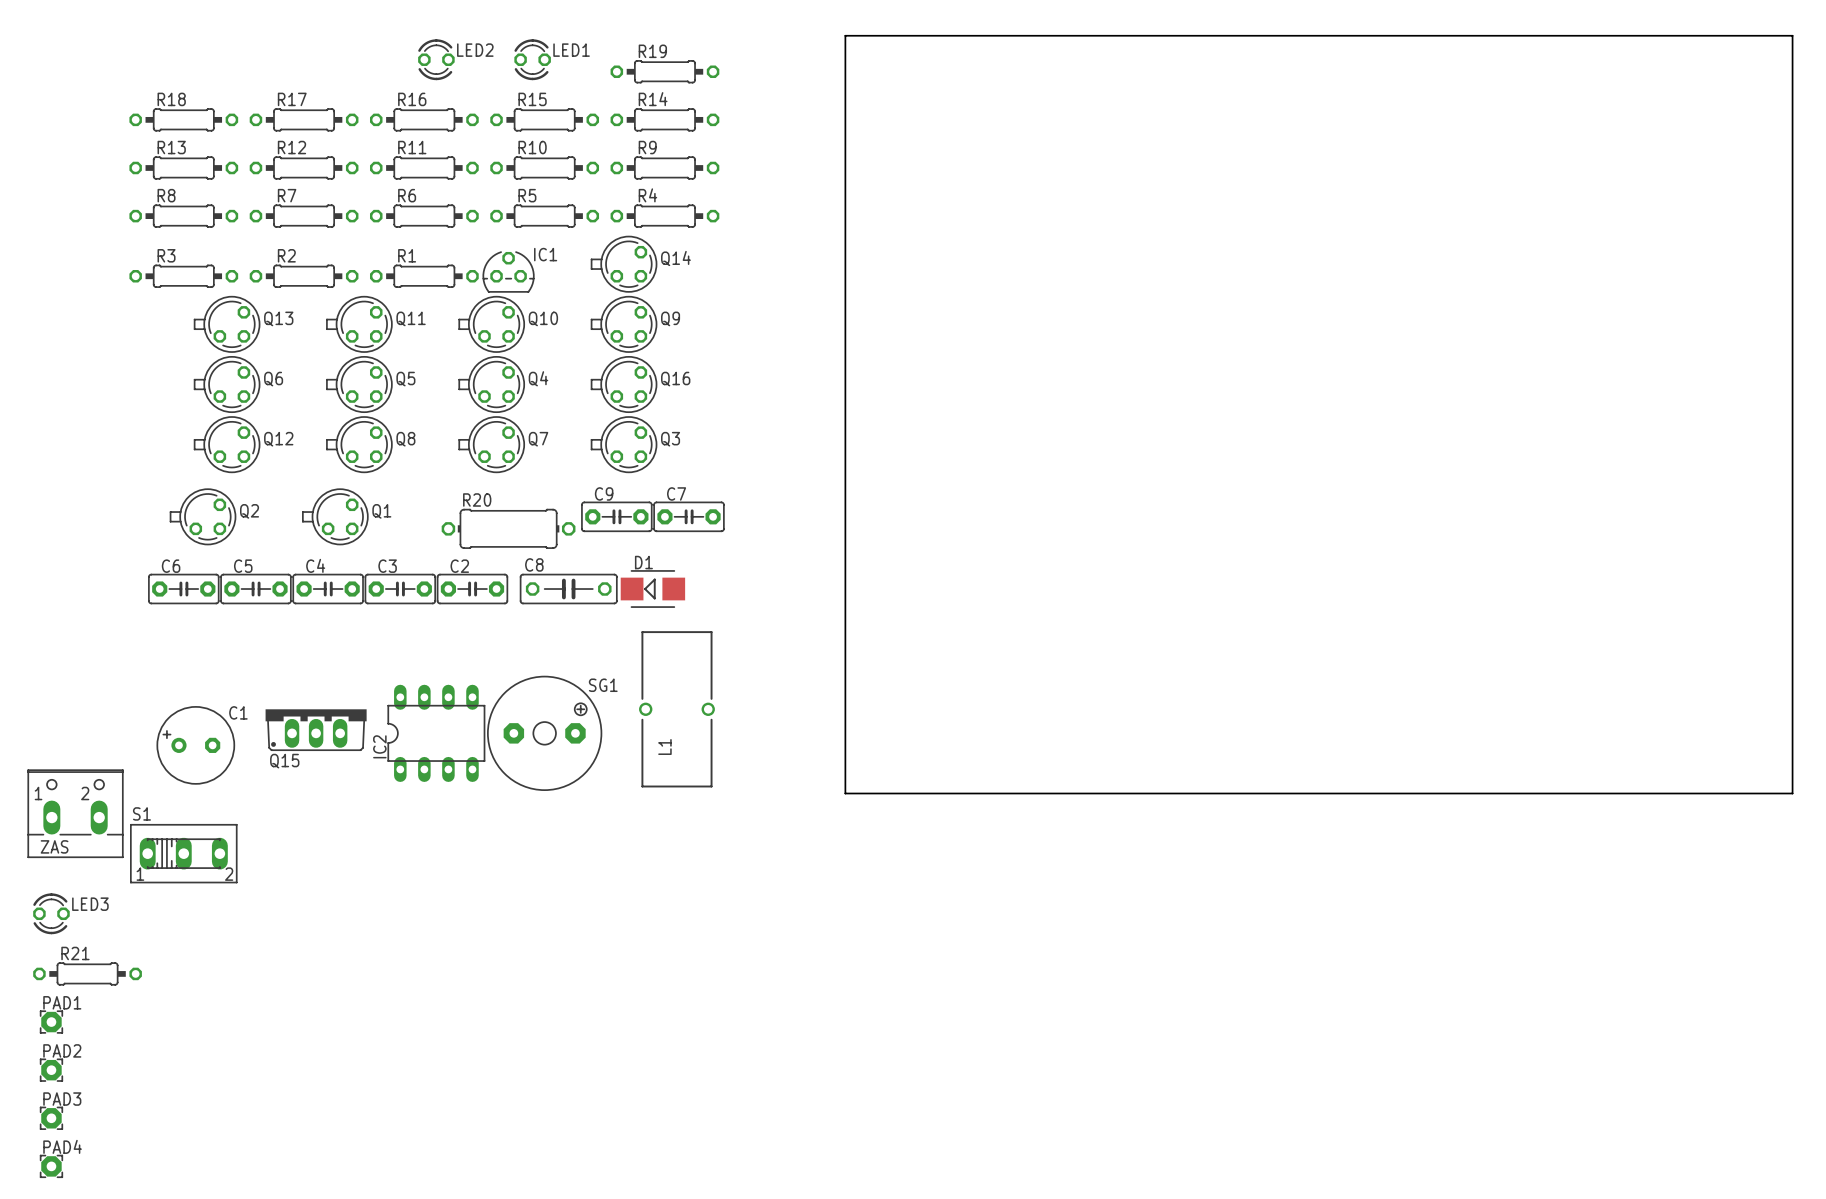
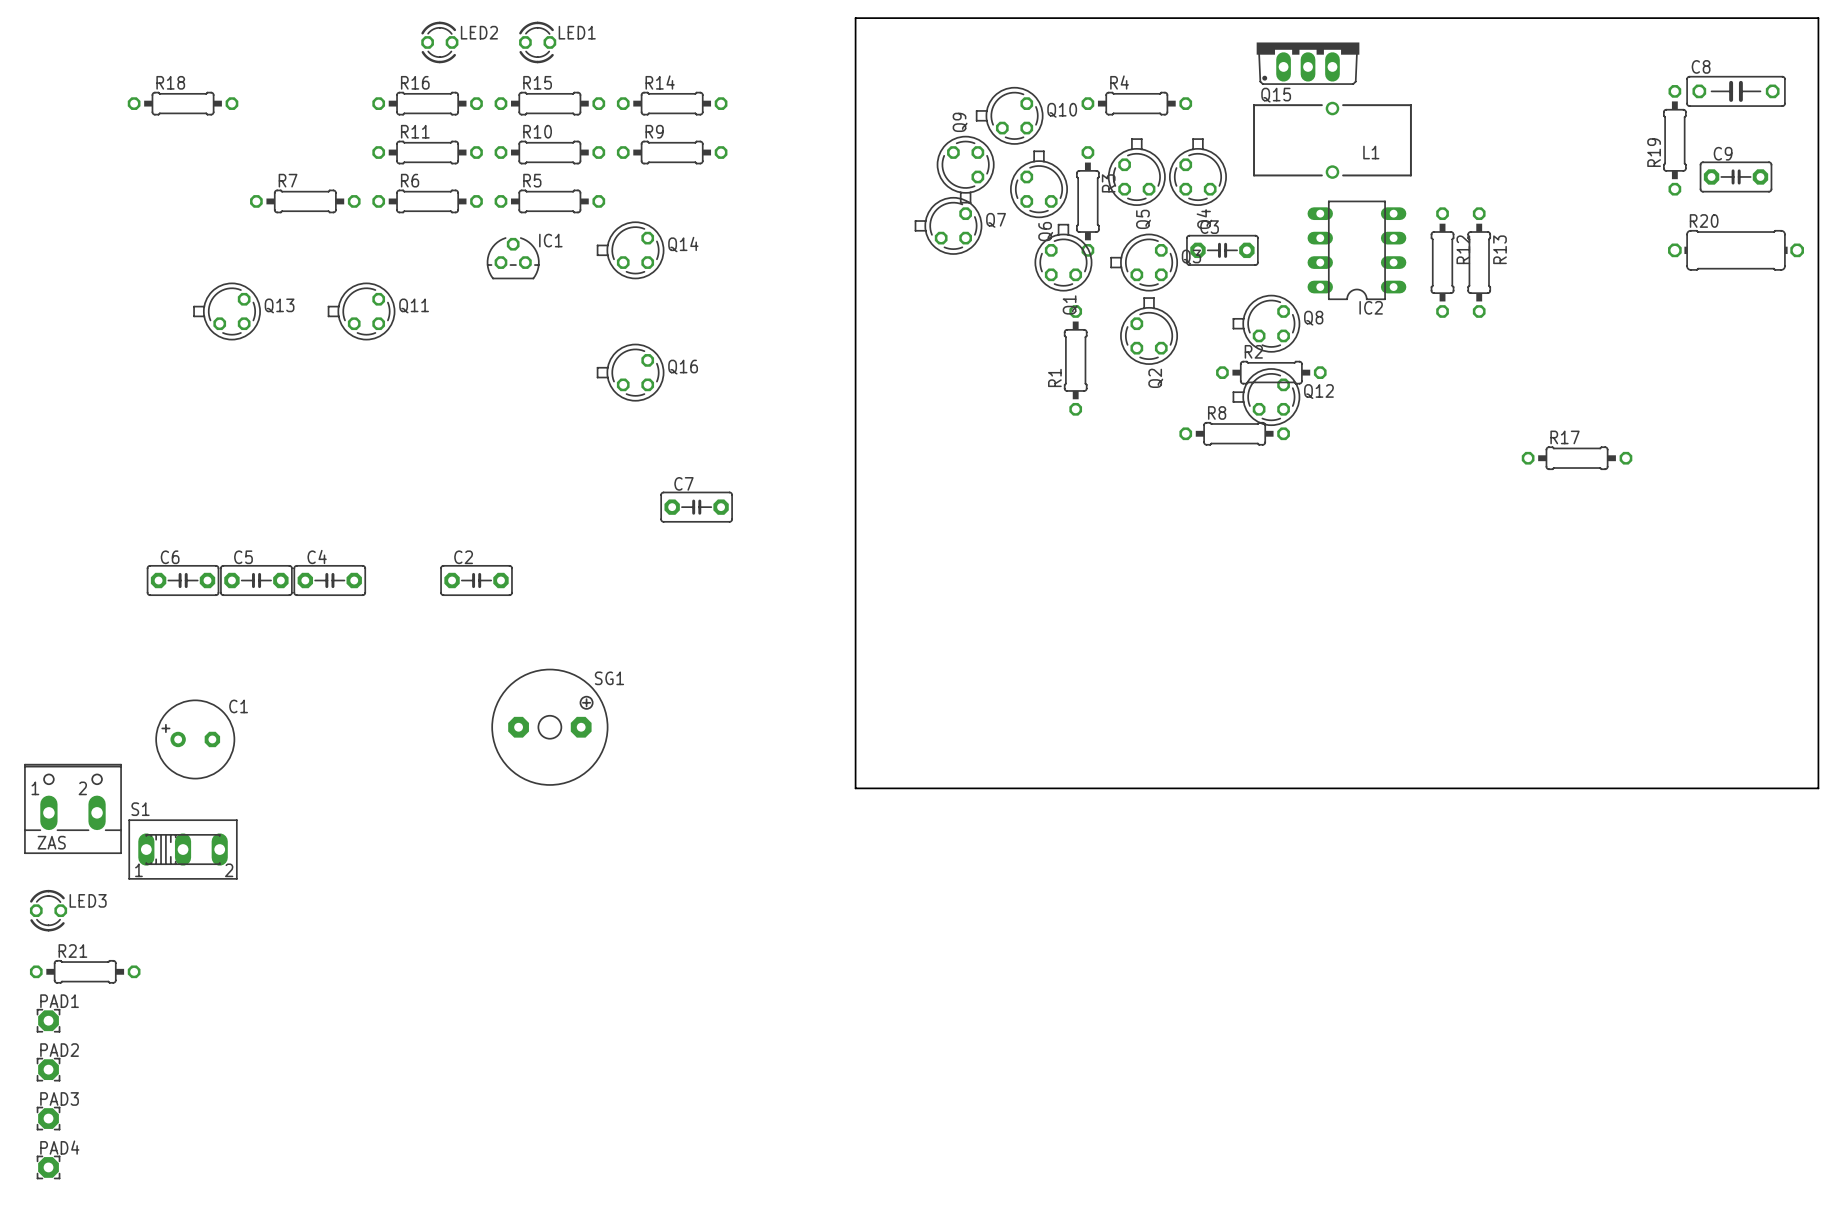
R19 name position: R19 (652, 51) -> R19 (1654, 152)
R19 rotation: 0° (664, 71) -> 90° clockwise (1674, 140)
R19 position: (664, 71) -> (1674, 140)
R17 position: (304, 119) -> (1577, 458)
R13 rotation: 0° (183, 167) -> 90° clockwise (1479, 262)
R13 position: (183, 167) -> (1479, 262)
R12 rotation: 0° (304, 167) -> 90° clockwise (1442, 262)
R12 position: (304, 167) -> (1442, 262)
R8 position: (183, 216) -> (1234, 433)
R4 position: (664, 216) -> (1136, 103)
R1 name position: R1 (407, 255) -> R1 (1054, 377)
R3 rotation: 0° (183, 276) -> 90° clockwise (1087, 201)
R3 position: (183, 276) -> (1087, 201)
R2 position: (304, 276) -> (1271, 372)
R1 rotation: 0° (424, 276) -> 90° clockwise (1075, 360)
R1 position: (424, 276) -> (1075, 360)
Q10 position: (491, 324) -> (1009, 115)
Q9 rotation: 0° (624, 324) -> 90° counterclockwise (965, 169)
Q9 position: (624, 324) -> (965, 169)
Q6 rotation: 0° (227, 384) -> 90° clockwise (1039, 184)
Q6 position: (227, 384) -> (1039, 184)
Q5 rotation: 0° (359, 384) -> 90° clockwise (1136, 172)
Q5 position: (359, 384) -> (1136, 172)
Q4 rotation: 0° (491, 384) -> 90° clockwise (1197, 172)
Q4 position: (491, 384) -> (1197, 172)
Q12 position: (227, 444) -> (1266, 397)
Q8 position: (359, 444) -> (1266, 323)
Q7 position: (491, 444) -> (948, 225)
Q3 position: (624, 444) -> (1144, 262)
Q2 rotation: 0° (203, 516) -> 90° clockwise (1149, 331)
Q2 position: (203, 516) -> (1149, 331)
Q1 rotation: 0° (335, 516) -> 90° clockwise (1063, 257)
Q1 position: (335, 516) -> (1063, 257)
C9 position: (616, 516) -> (1736, 176)
R20 position: (508, 528) -> (1736, 250)
C3 position: (400, 589) -> (1222, 250)
C8 position: (568, 589) -> (1736, 91)
D1: (652, 589) -> none
L1 rotation: 0° (676, 709) -> 90° clockwise (1332, 140)
L1 position: (676, 709) -> (1332, 140)
Q15 position: (316, 730) -> (1308, 63)
IC2 rotation: 0° (436, 733) -> 90° counterclockwise (1356, 250)
IC2 position: (436, 733) -> (1356, 250)
L1 name position: L1 (664, 746) -> L1 (1371, 152)

